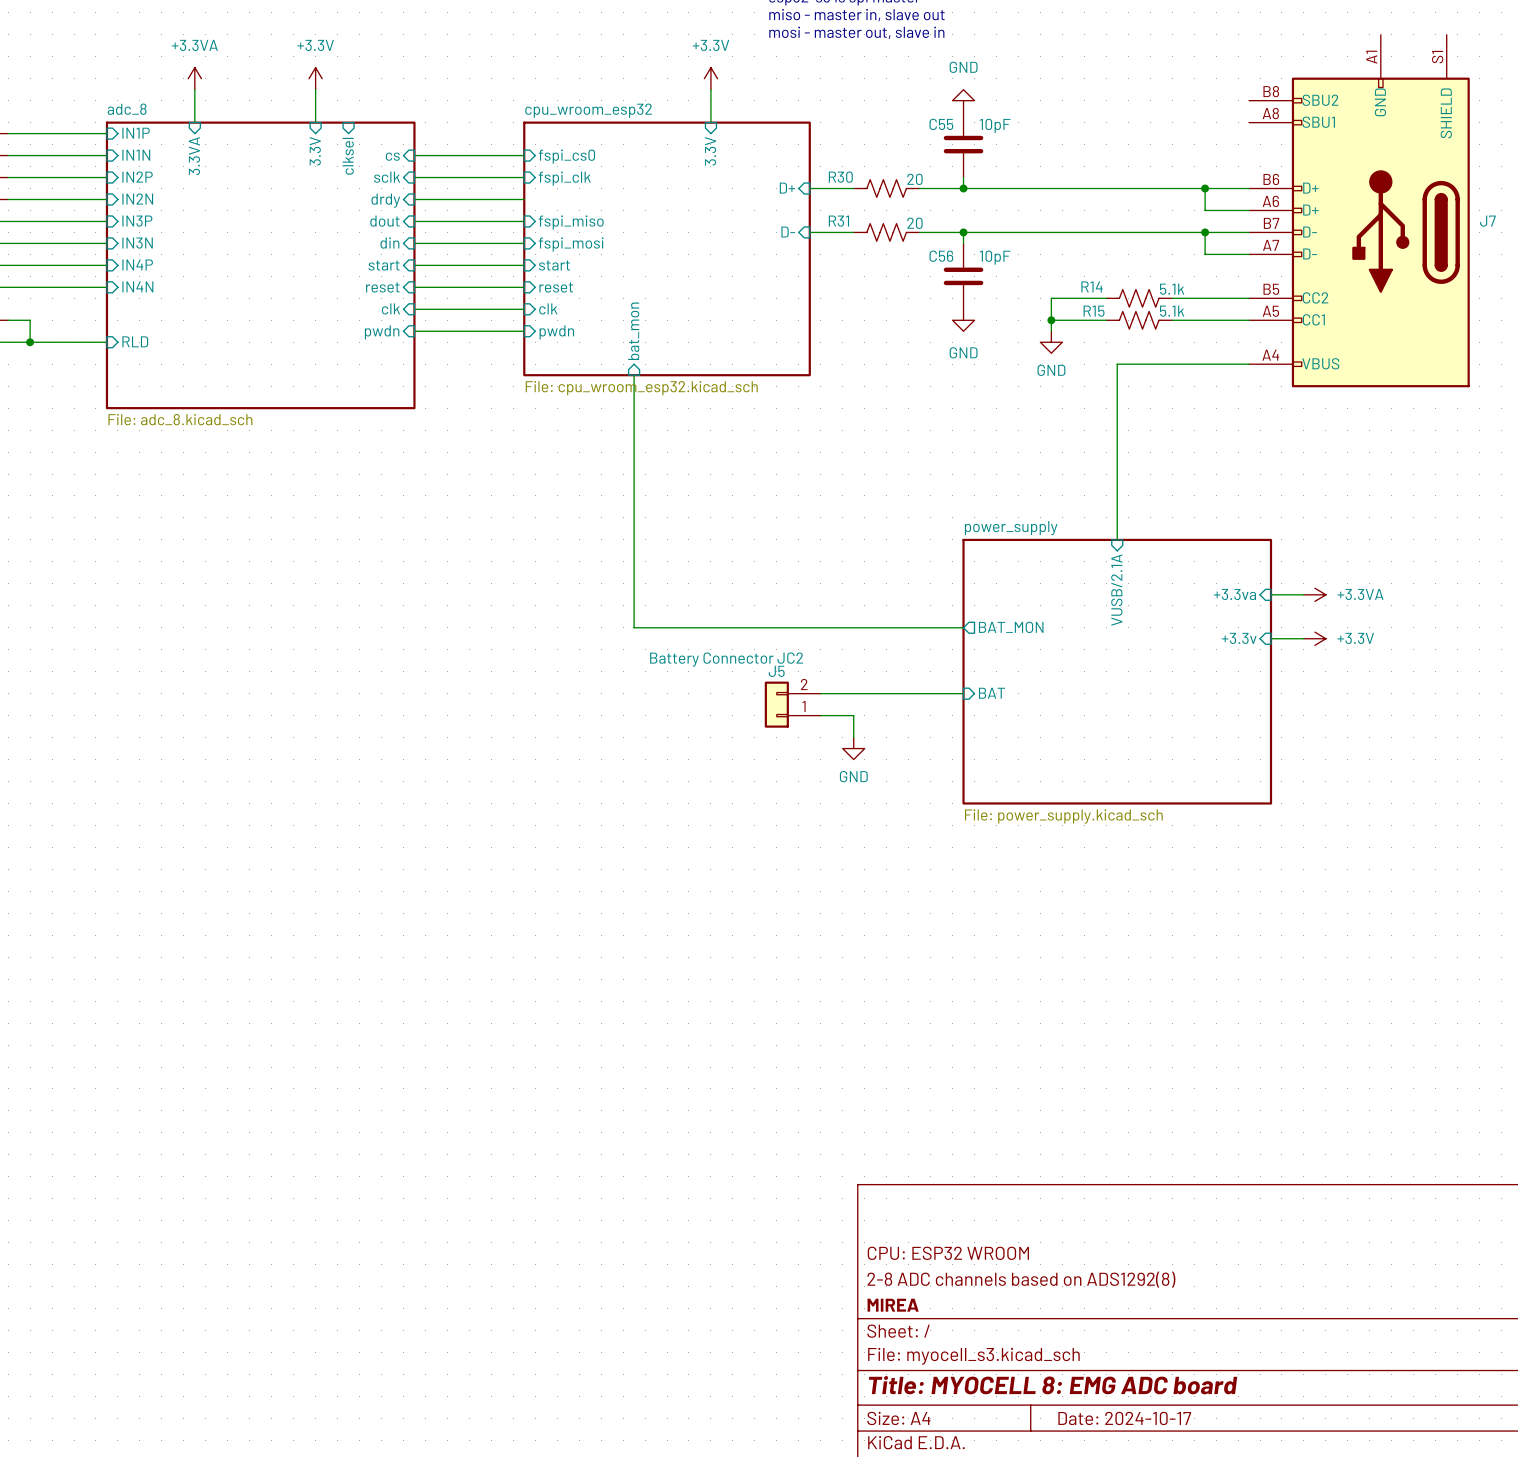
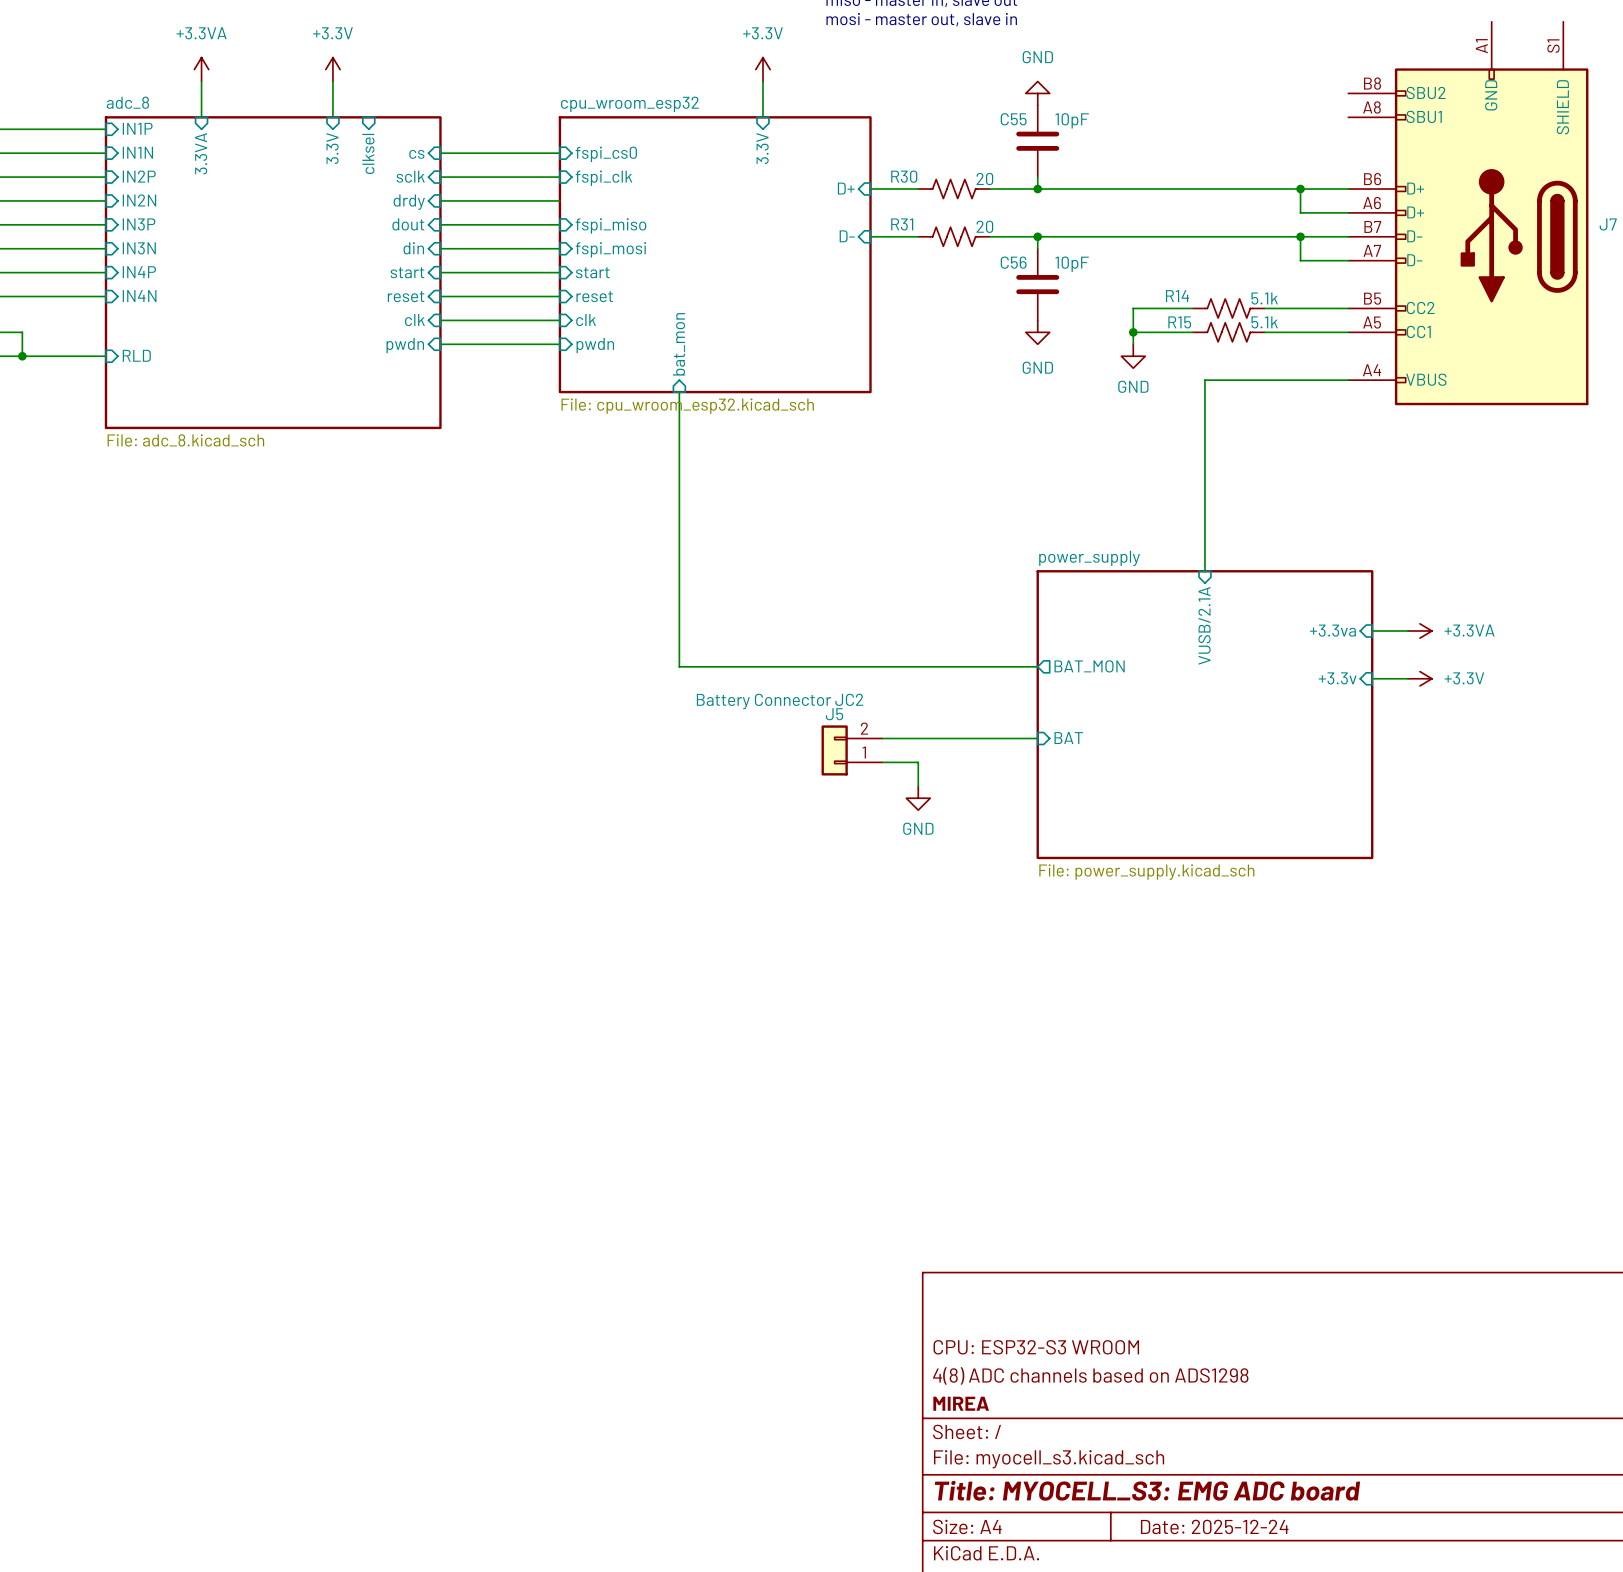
title block: CPU: ESP32 WROOM (948, 1253) -> CPU: ESP32-S3 WROOM (1036, 1347)
title block: 2-8 ADC channels based on ADS1292(8) (1021, 1279) -> 4(8) ADC channels based on ADS1298 (1090, 1375)
title block: Title: MYOCELL 8: EMG ADC board (1053, 1385) -> Title: MYOCELL_S3: EMG ADC board (1147, 1490)
title block: Date: 2024-10-17 (1124, 1418) -> Date: 2025-12-24 (1214, 1526)

